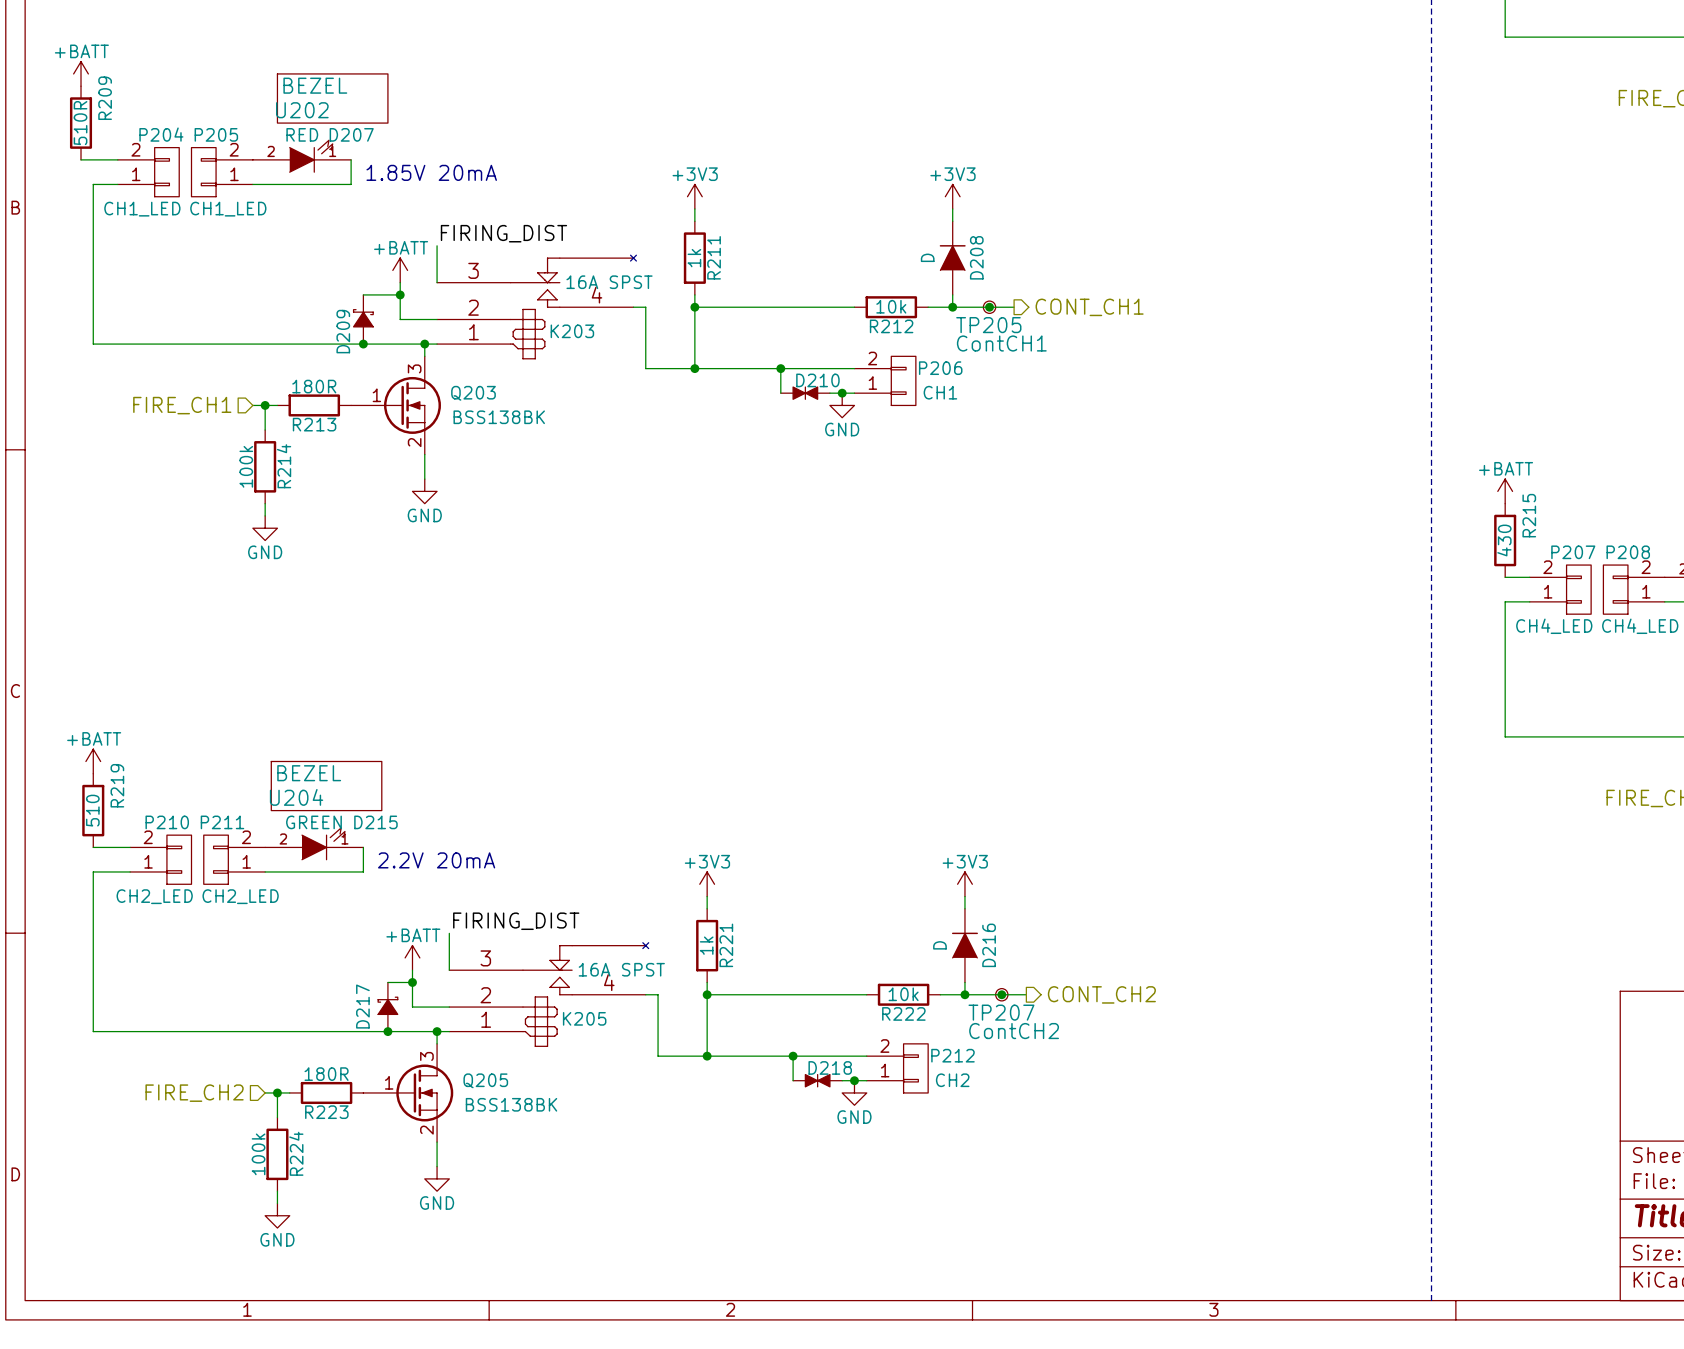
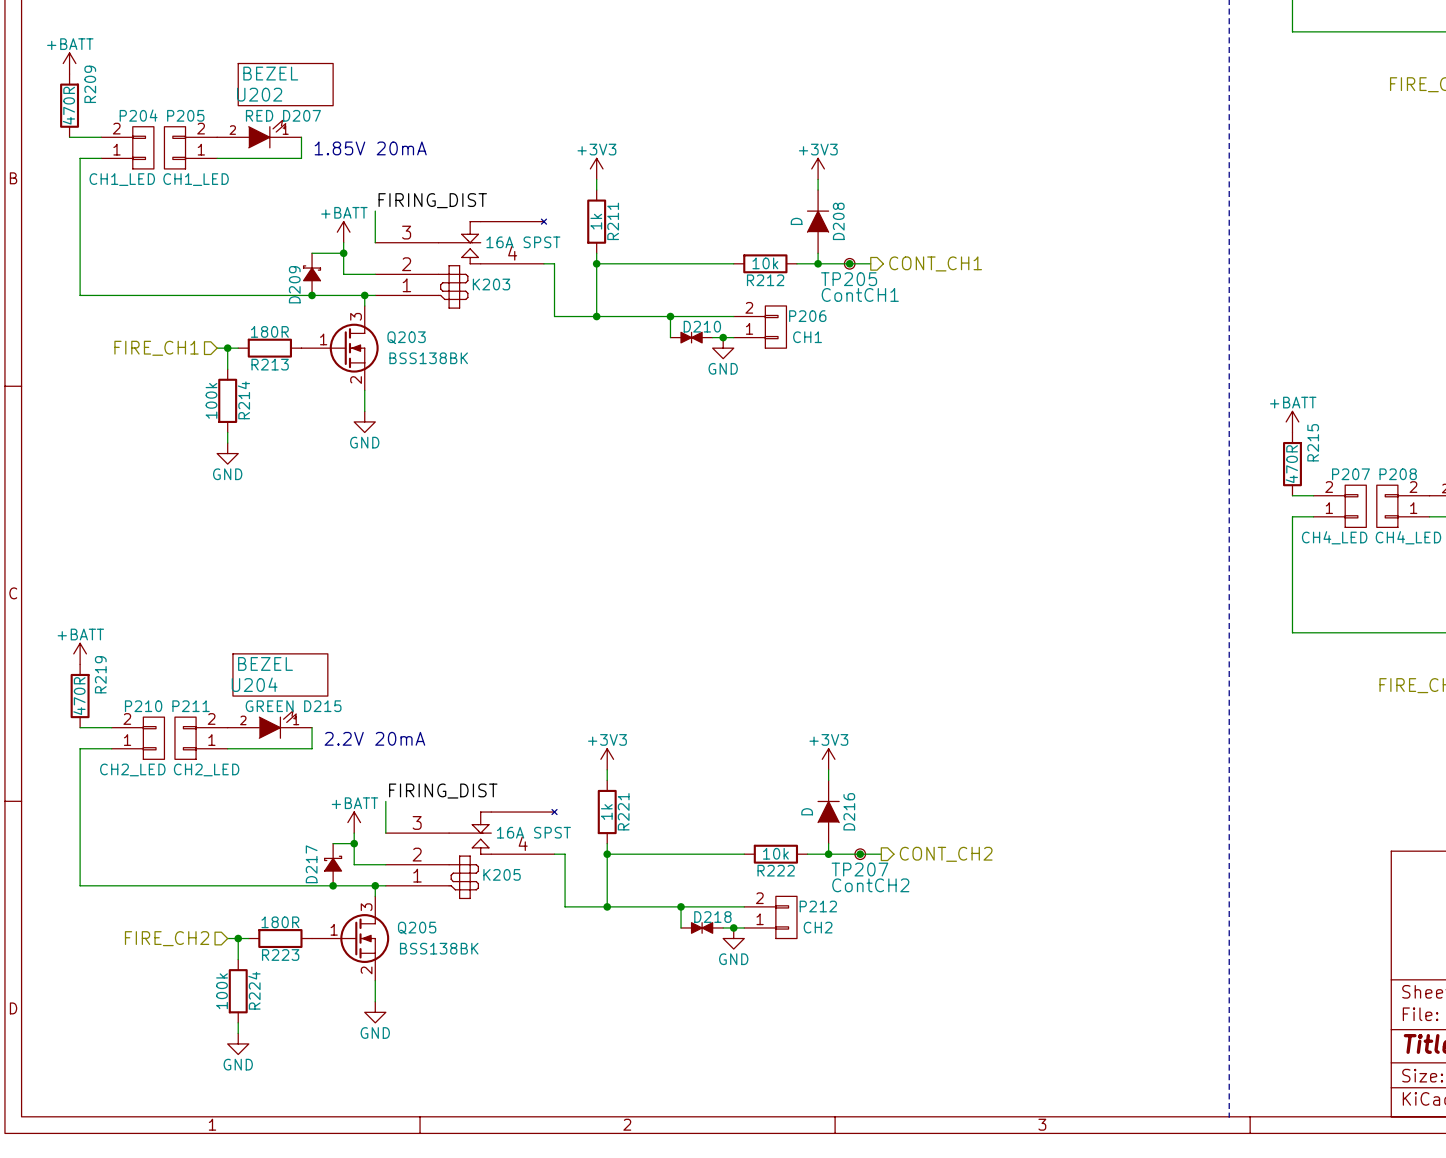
R209 value: 510R (80, 123) -> 470R (68, 105)
R215 value: 430 (1504, 540) -> 470R (1291, 464)
R219 value: 510 (92, 810) -> 470R (79, 696)

